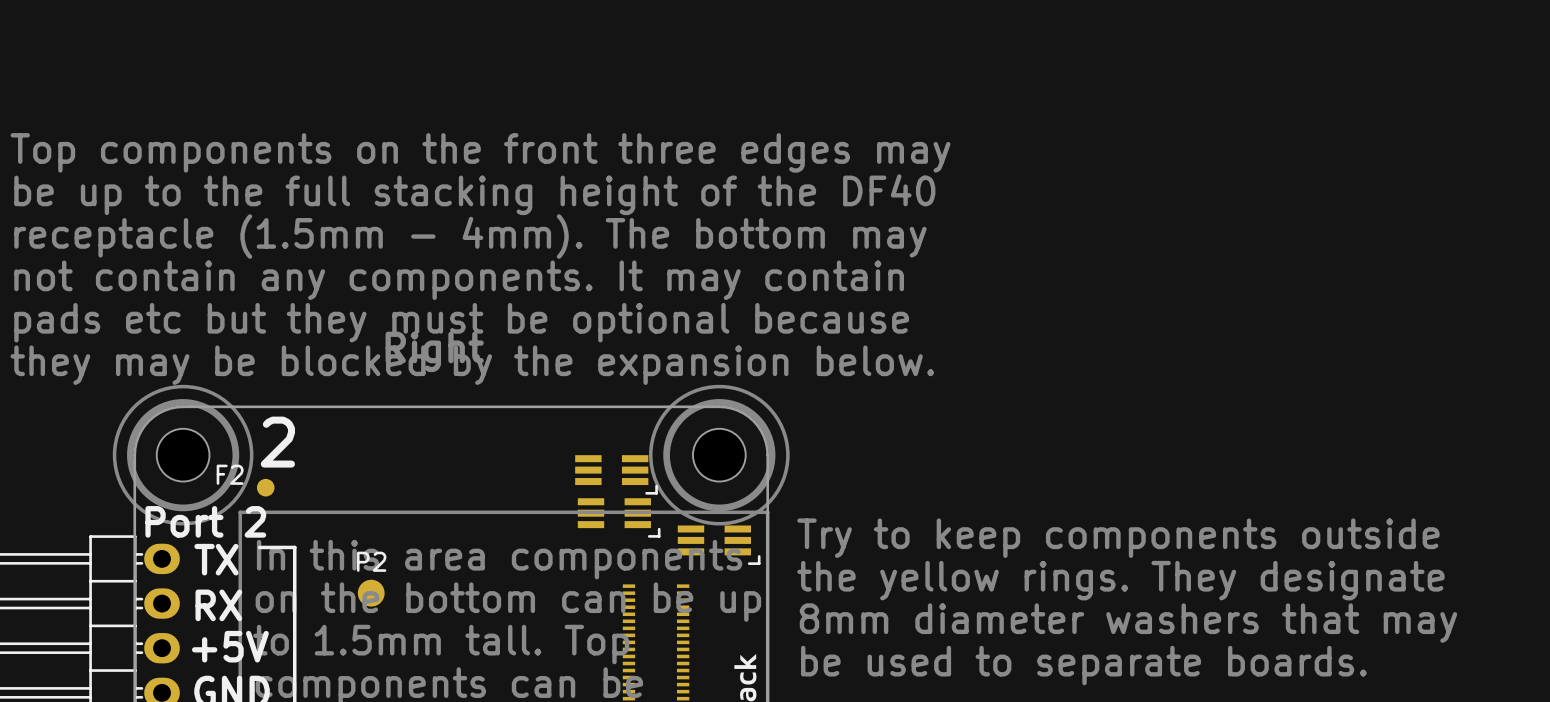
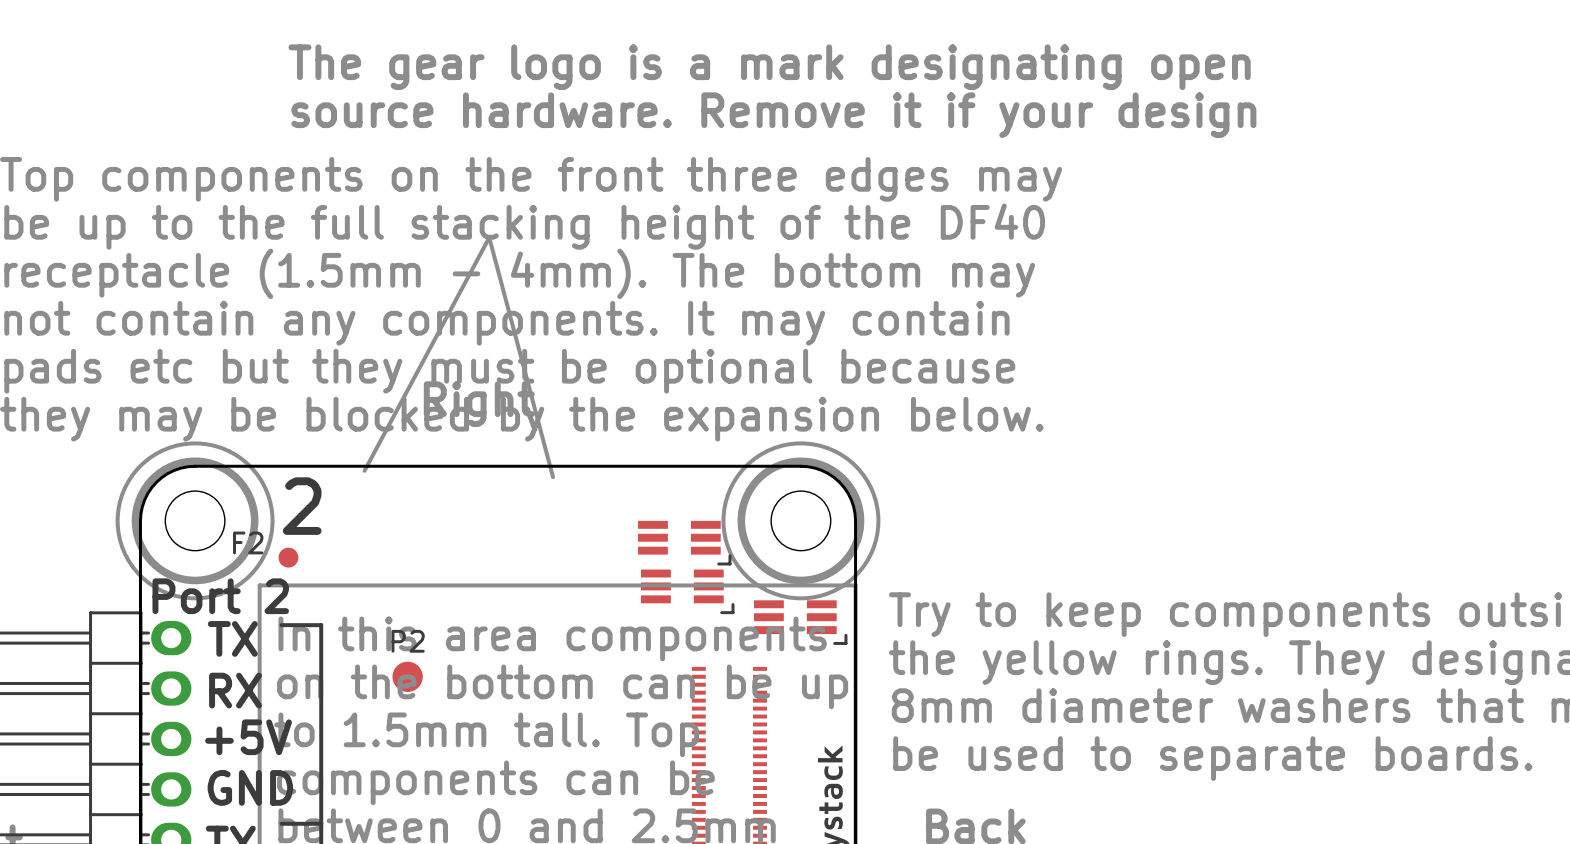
text: none -> The gear logo is a mark designating open (769, 67)
text: none -> source hardware. Remove it if your design (773, 115)
line: none -> (364, 470) (489, 237) (553, 477)

